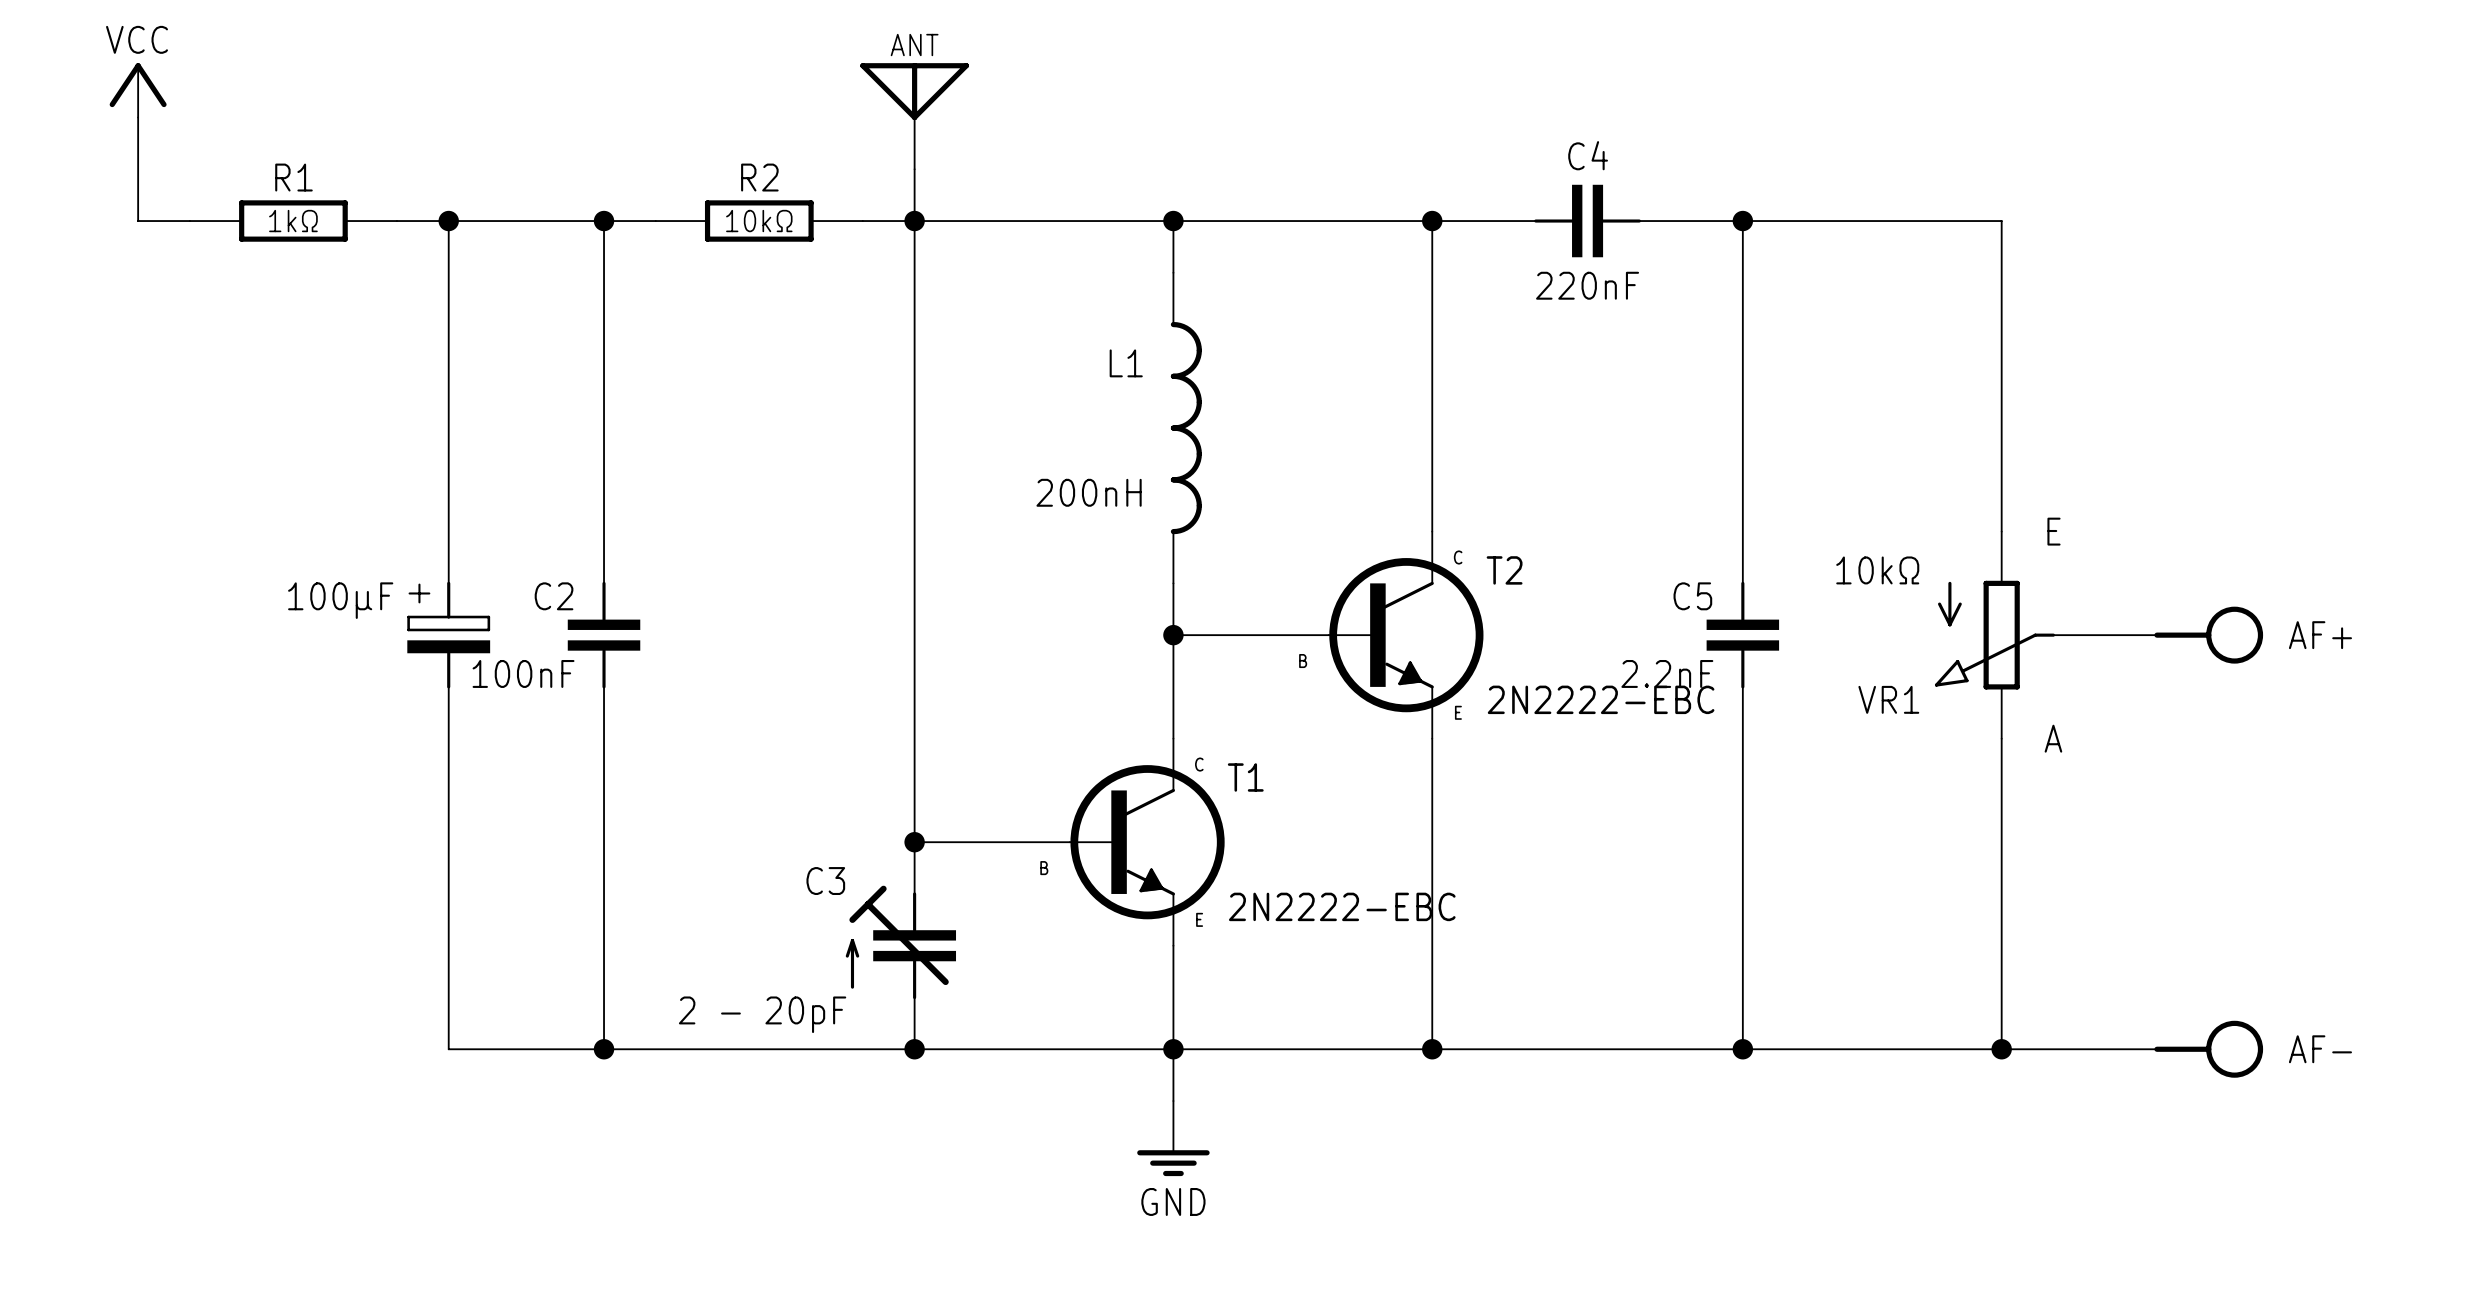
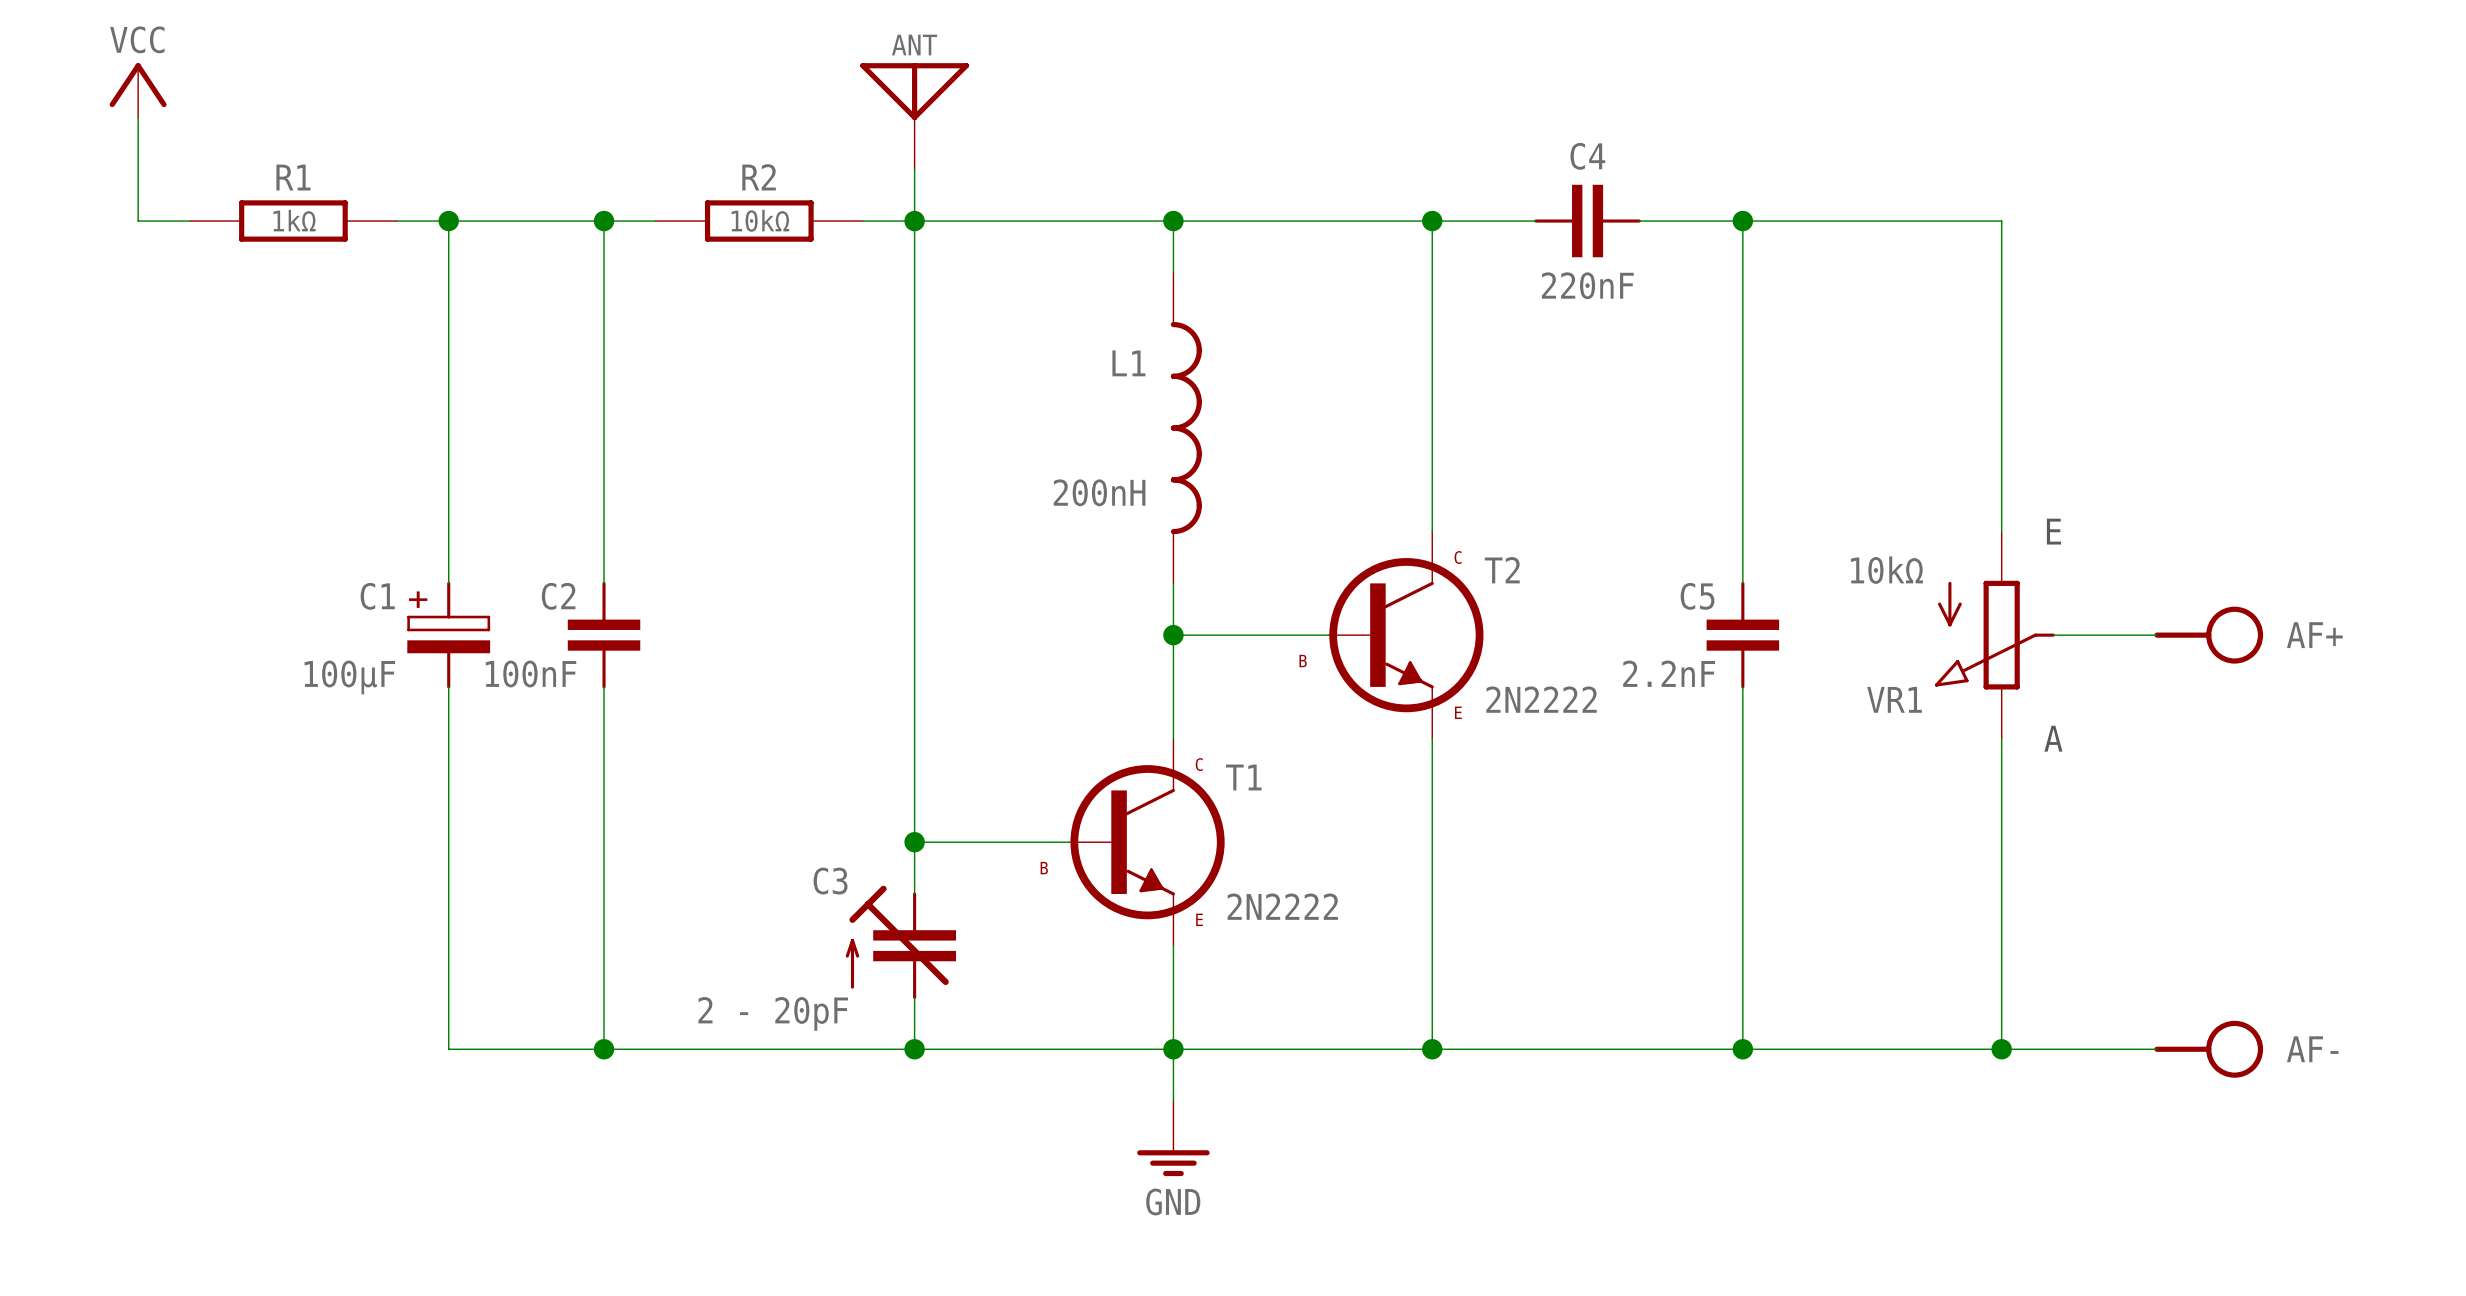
100µF name: 100µF (340, 600) -> C1 (377, 596)
100µF value: none -> 100µF (349, 677)
T2 value: 2N2222-EBC (1601, 699) -> 2N2222 (1541, 699)
T1 value: 2N2222-EBC (1342, 906) -> 2N2222 (1282, 906)

